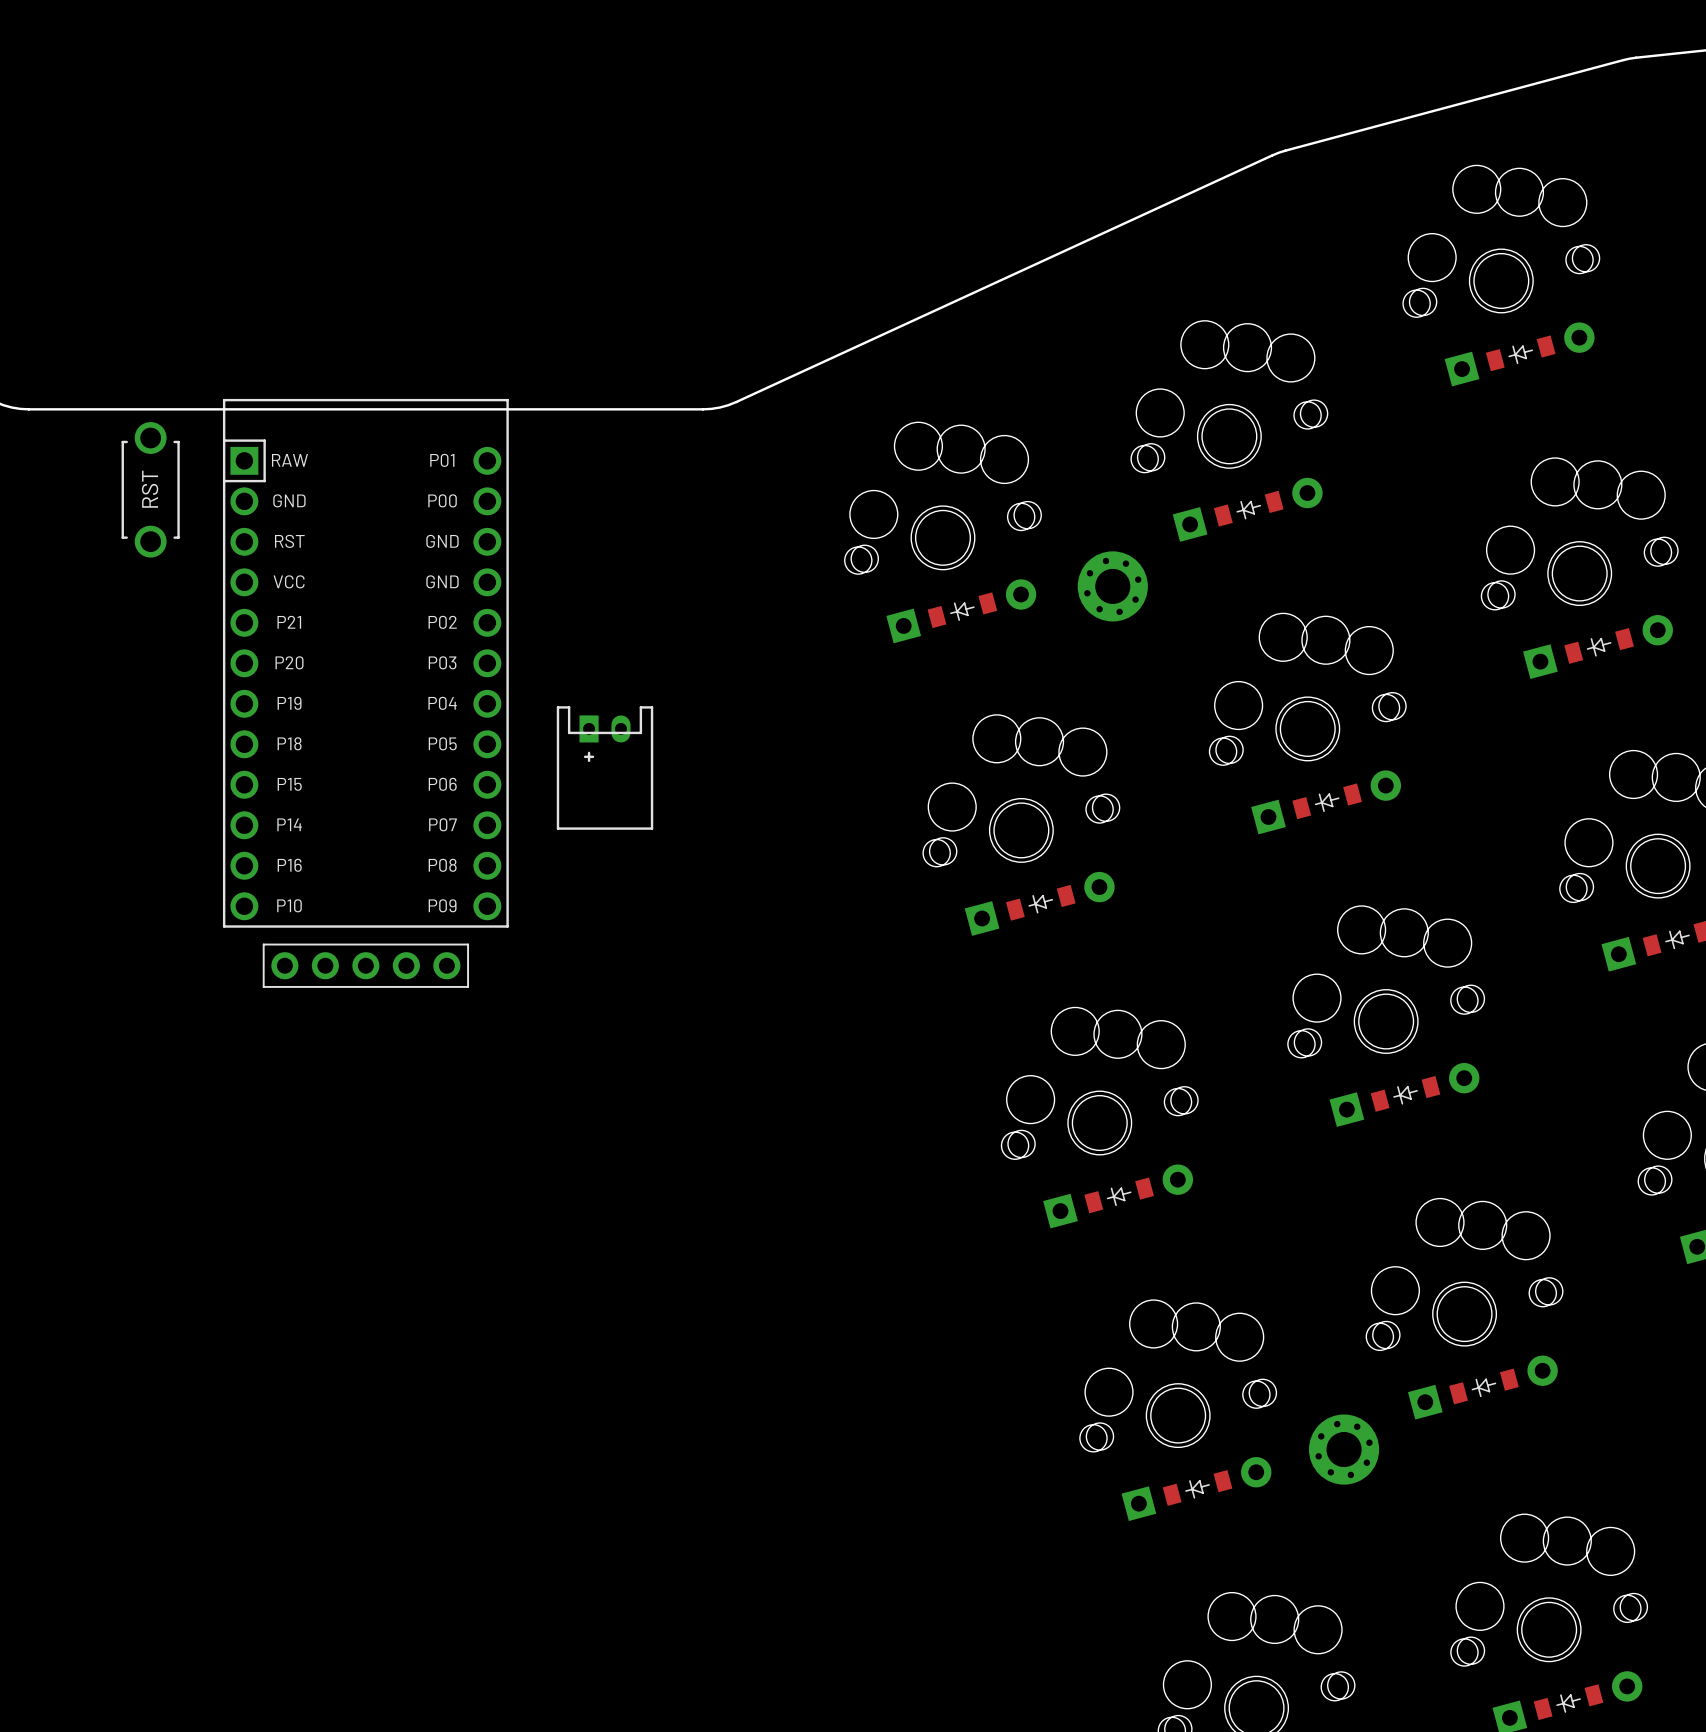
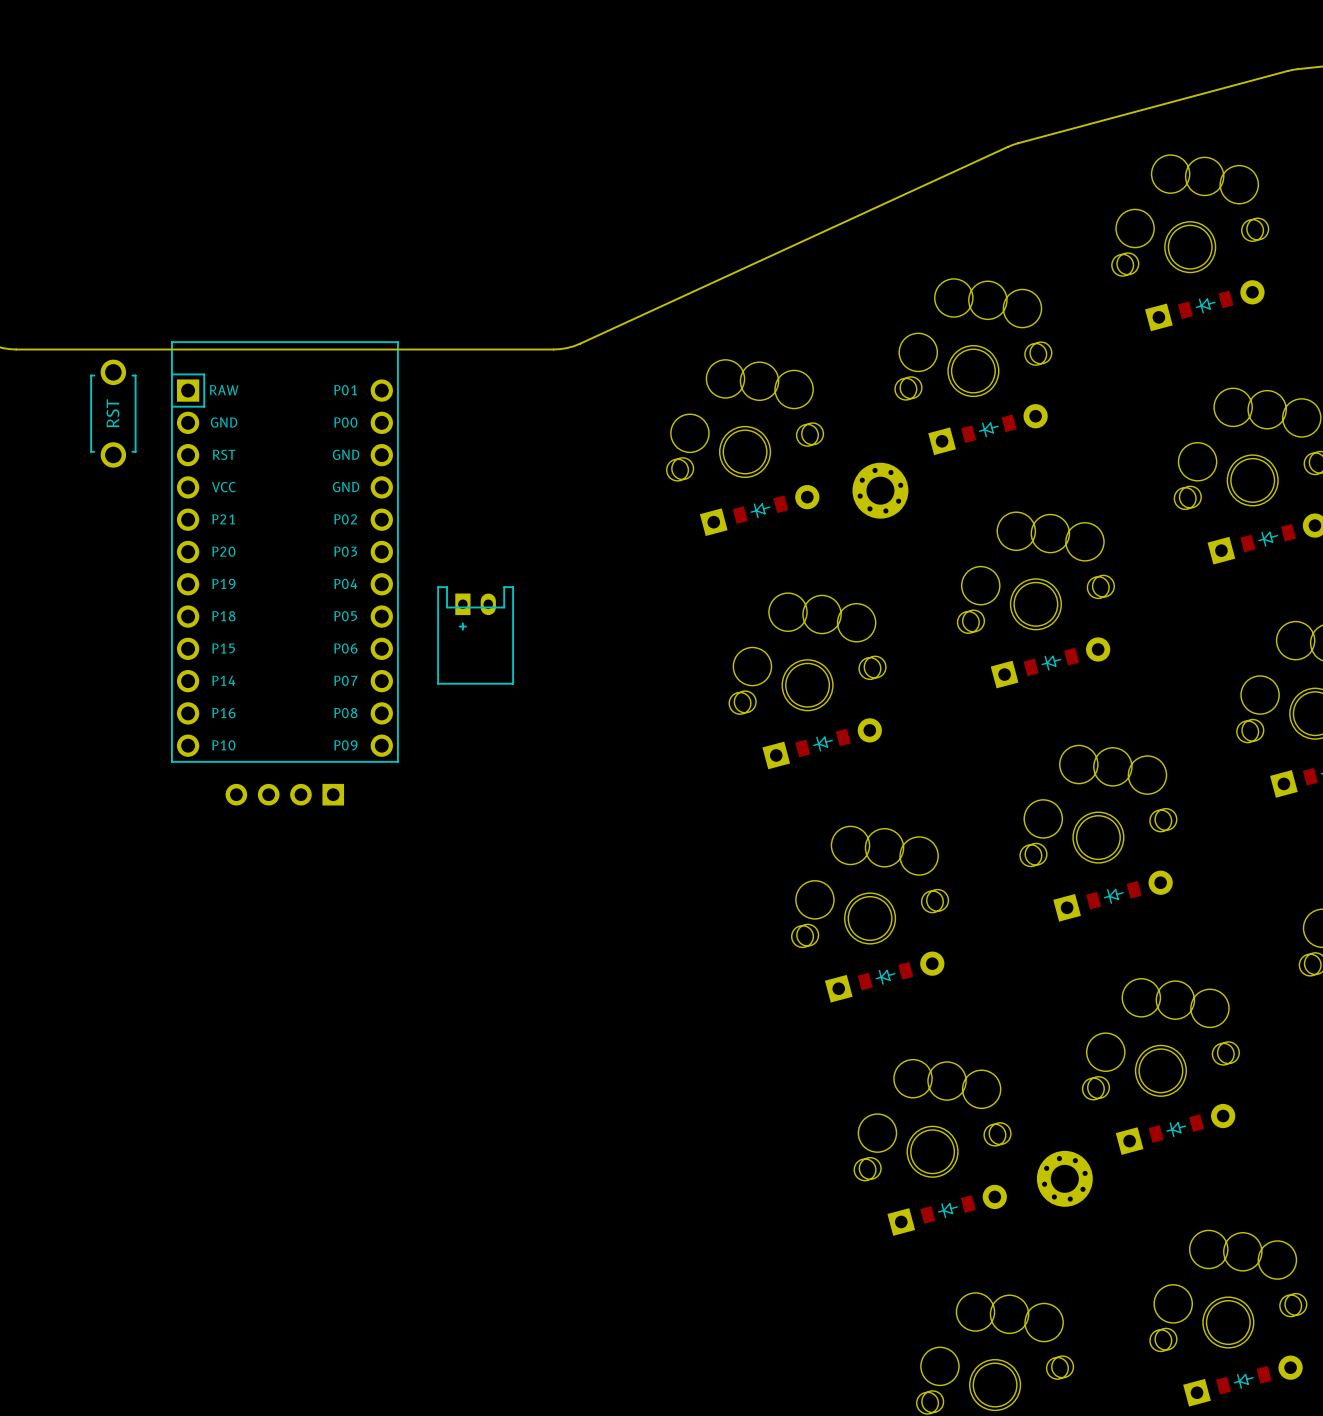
part footprint: [262, 943, 470, 988] -> [225, 783, 345, 806]

